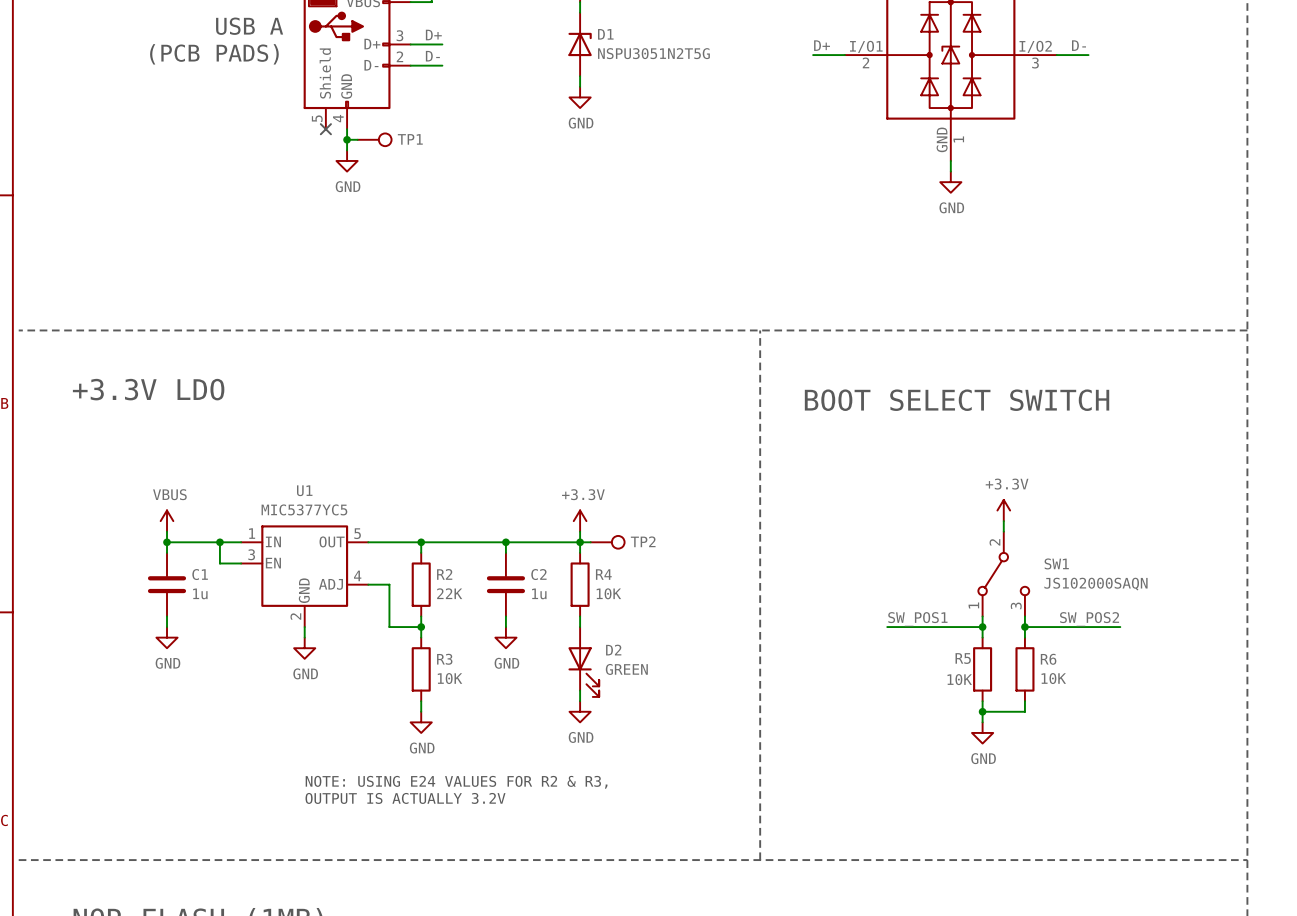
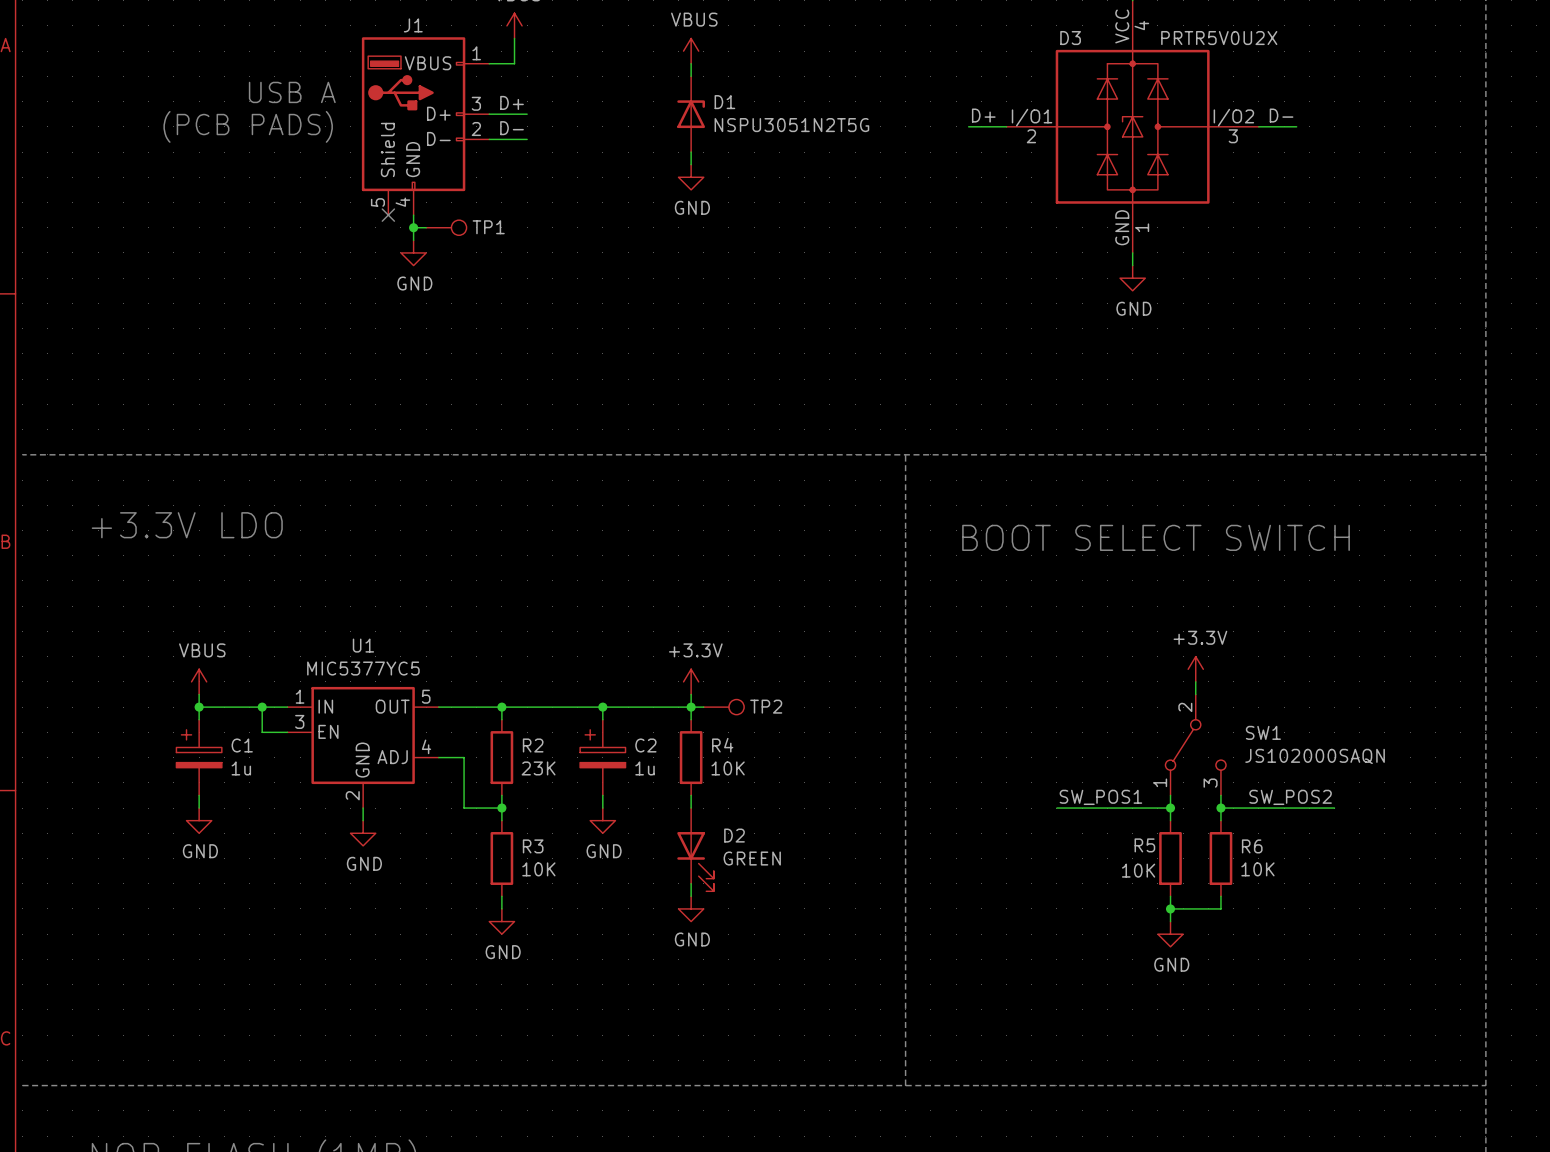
C1 symbol: [147, 552, 187, 617] -> [176, 719, 222, 796]
C2 symbol: [486, 552, 526, 617] -> [580, 719, 626, 796]
R2 value: 22K (449, 593) -> 23K (538, 768)
text: NOTE: USING E24 VALUES FOR R2 & R3, (456, 782) -> none
text: OUTPUT IS ACTUALLY 3.2V (405, 798) -> none

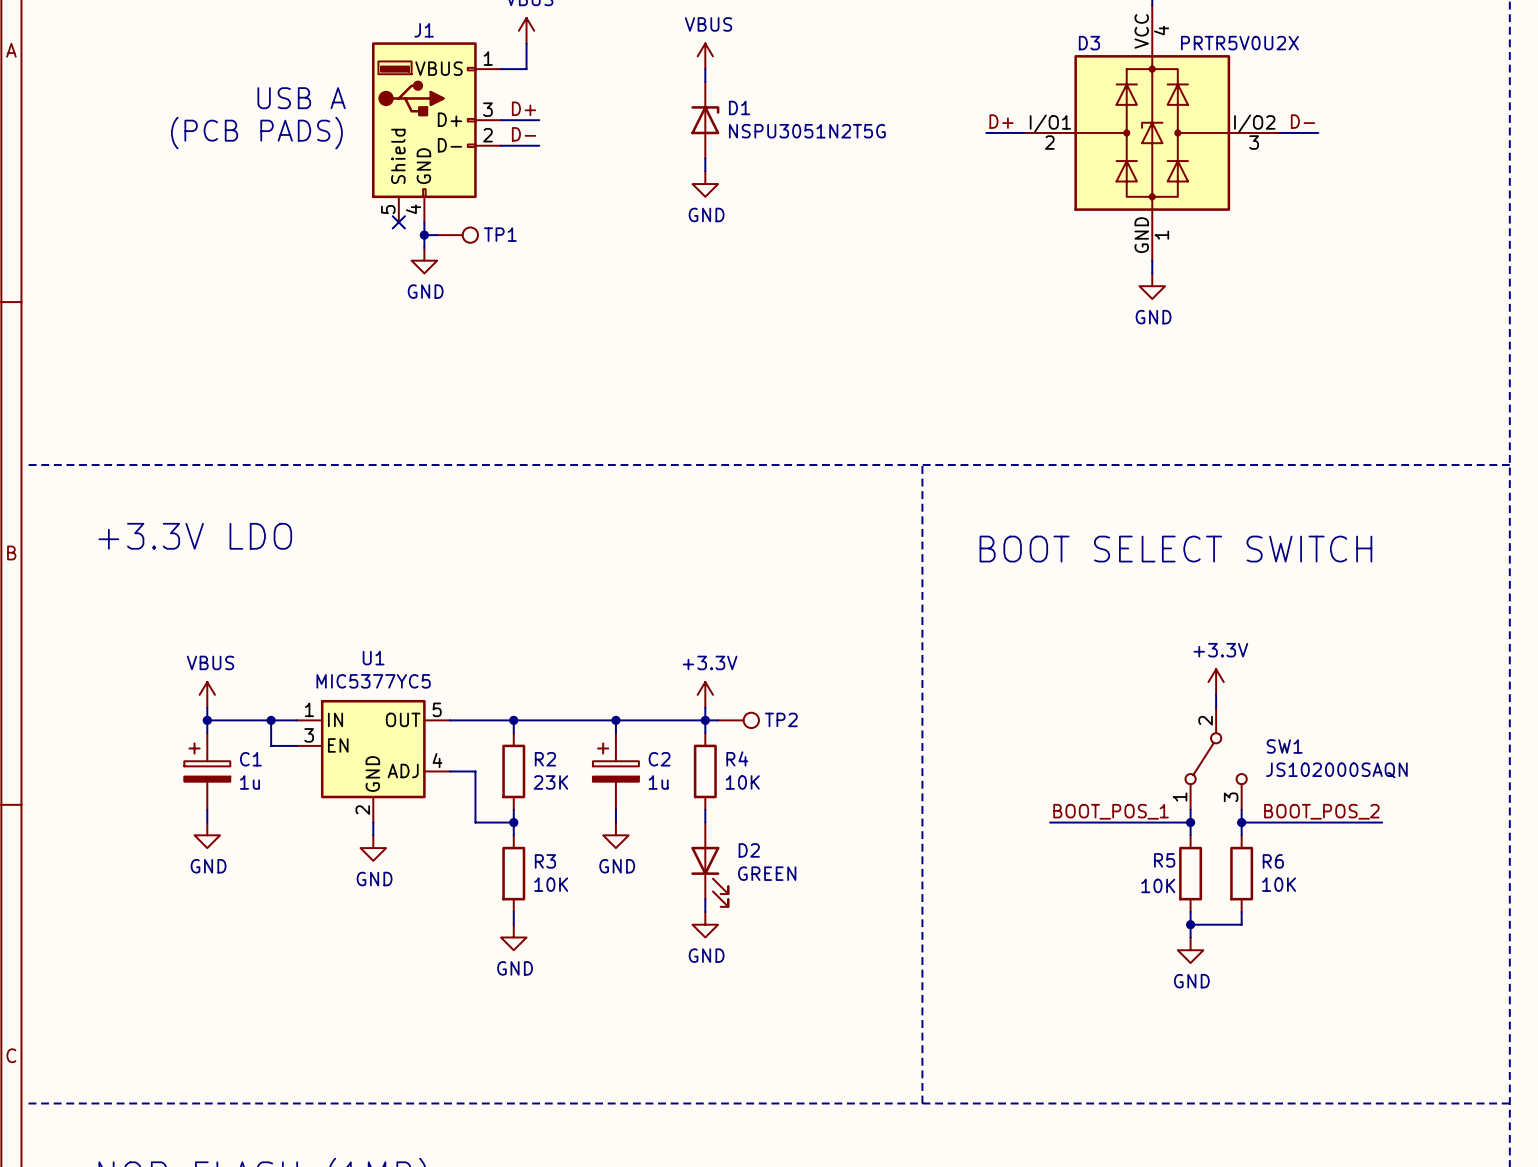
label: none -> BOOT_POS_1 (1111, 811)
label: SW_POS1 (1100, 797) -> none
label: SW_POS2 (1290, 797) -> none
label: none -> BOOT_POS_2 (1321, 811)
wire: none -> (1050, 822) (1075, 822)
wire: none -> (1356, 822) (1382, 822)

